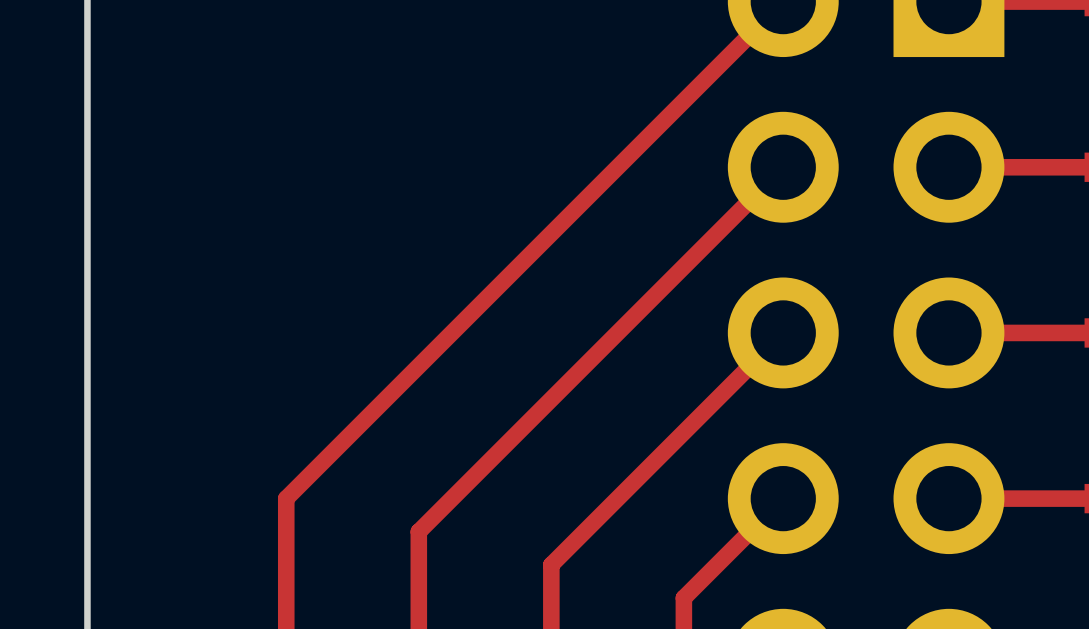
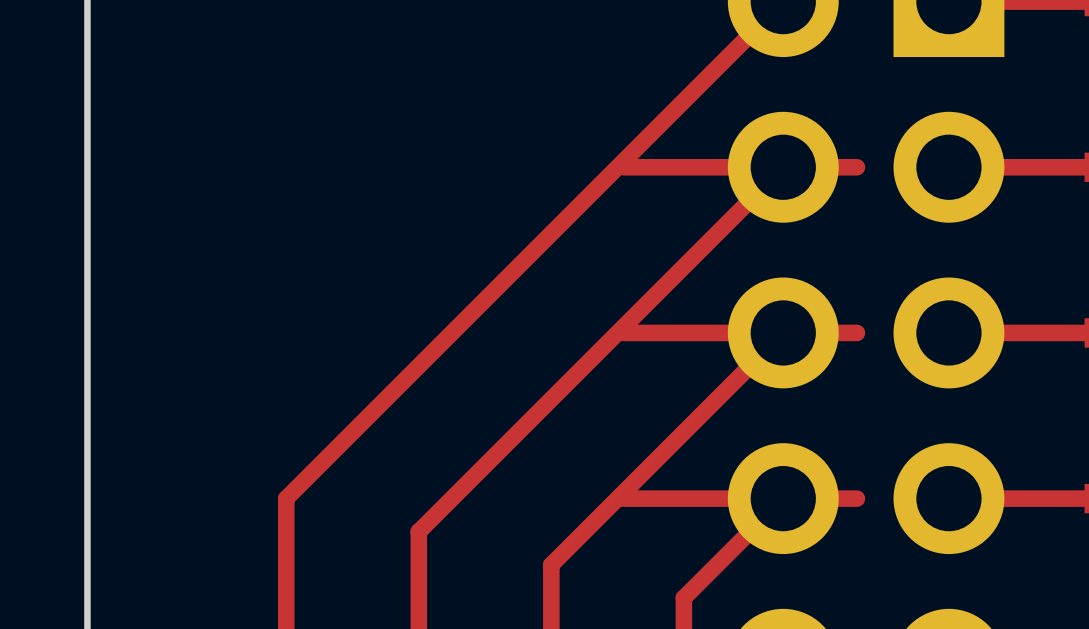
top track: none -> (856, 167) (624, 167)
top track: none -> (856, 332) (624, 332)
top track: none -> (856, 498) (624, 498)

